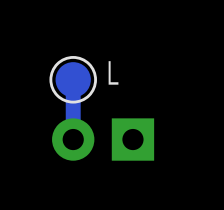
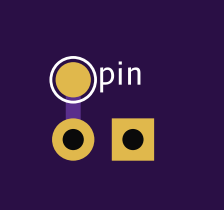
text: L (113, 72) -> pin (120, 76)

